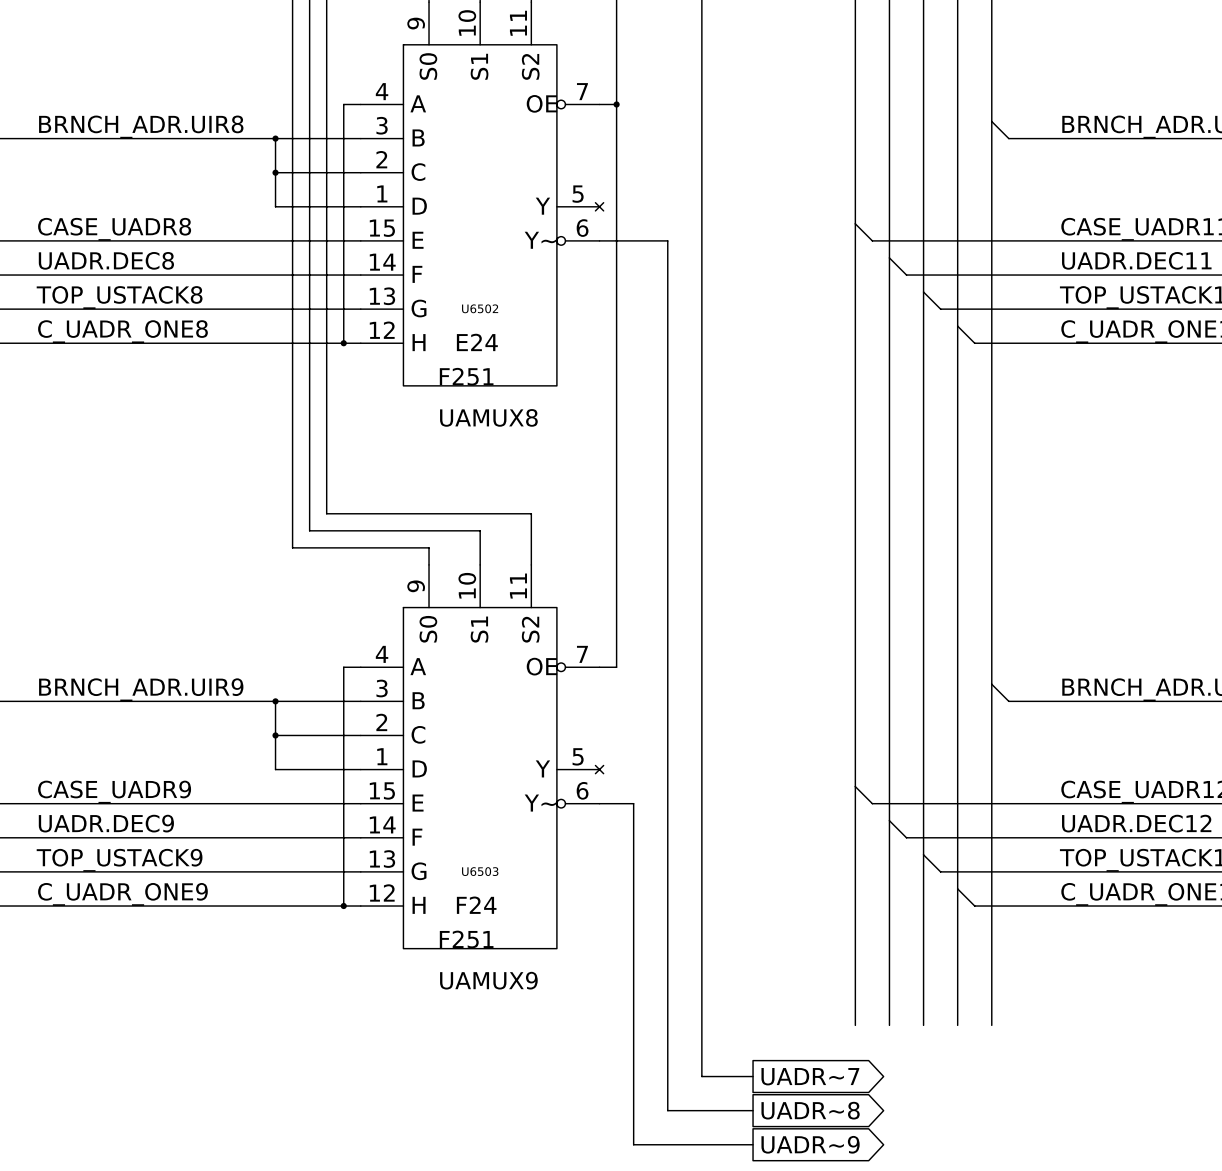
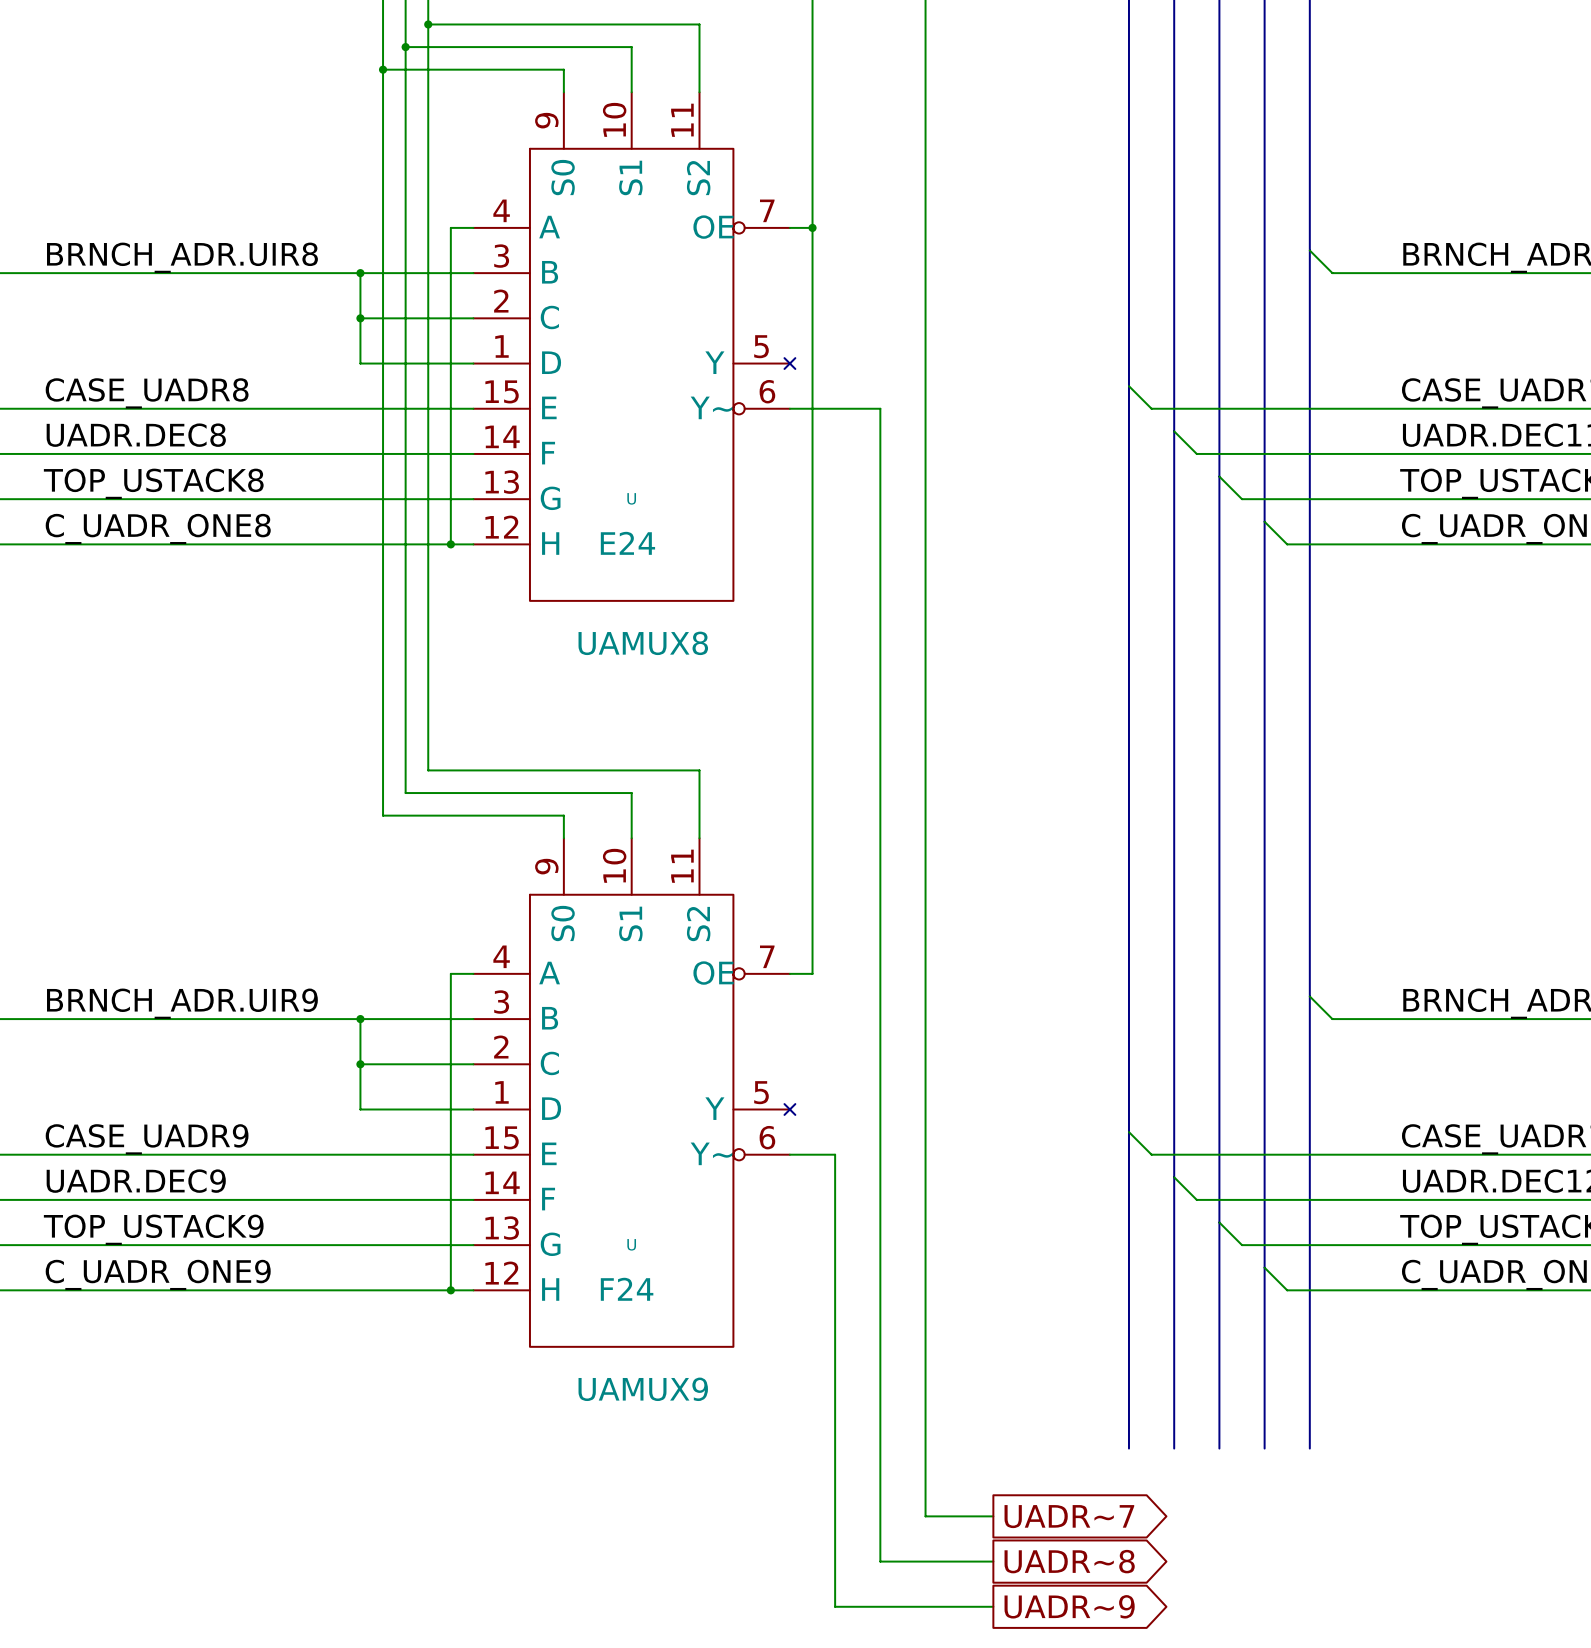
U6502 name: U6502 (480, 308) -> U (631, 498)
U6502 value: F251 (466, 376) -> none
U6503 name: U6503 (480, 871) -> U (631, 1244)
U6503 value: F251 (466, 939) -> none

